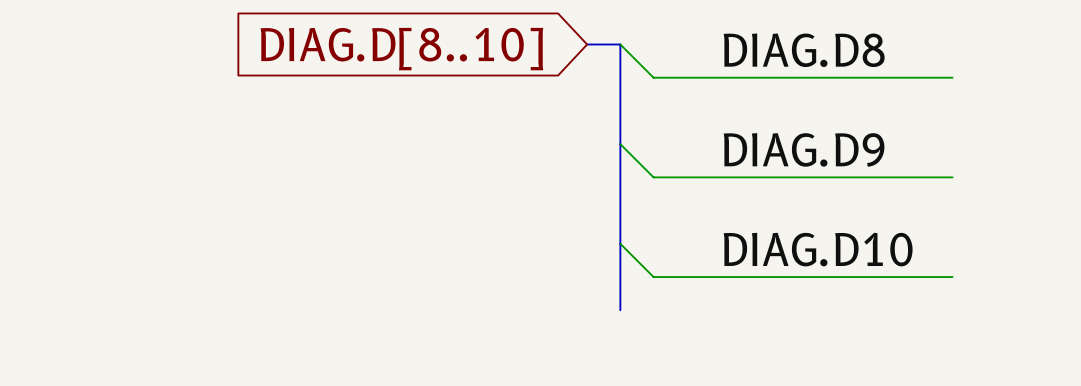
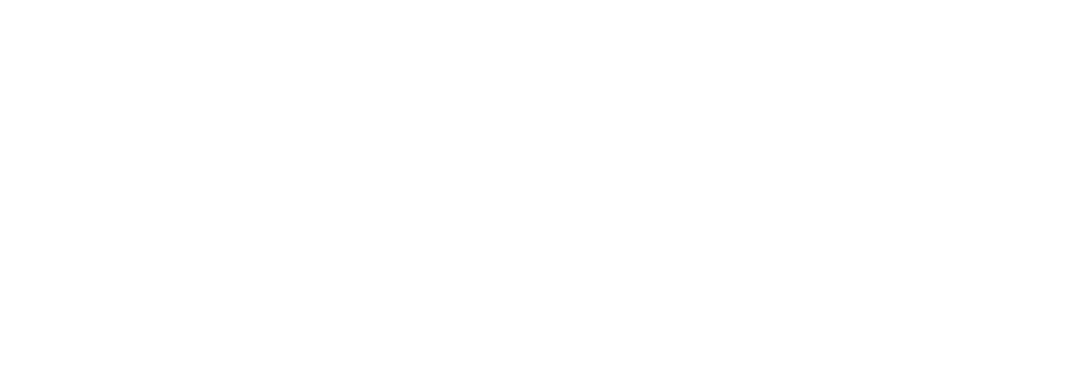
bus: (587, 44) (620, 44) (620, 310) -> none
wire: (620, 44) (653, 77) (952, 77) -> none
global label: DIAG.D[8..10] (401, 49) -> none
label: DIAG.D8 (804, 50) -> none
wire: (620, 144) (653, 177) (952, 177) -> none
label: DIAG.D9 (804, 149) -> none
wire: (620, 243) (653, 277) (952, 277) -> none
label: DIAG.D10 (818, 249) -> none

